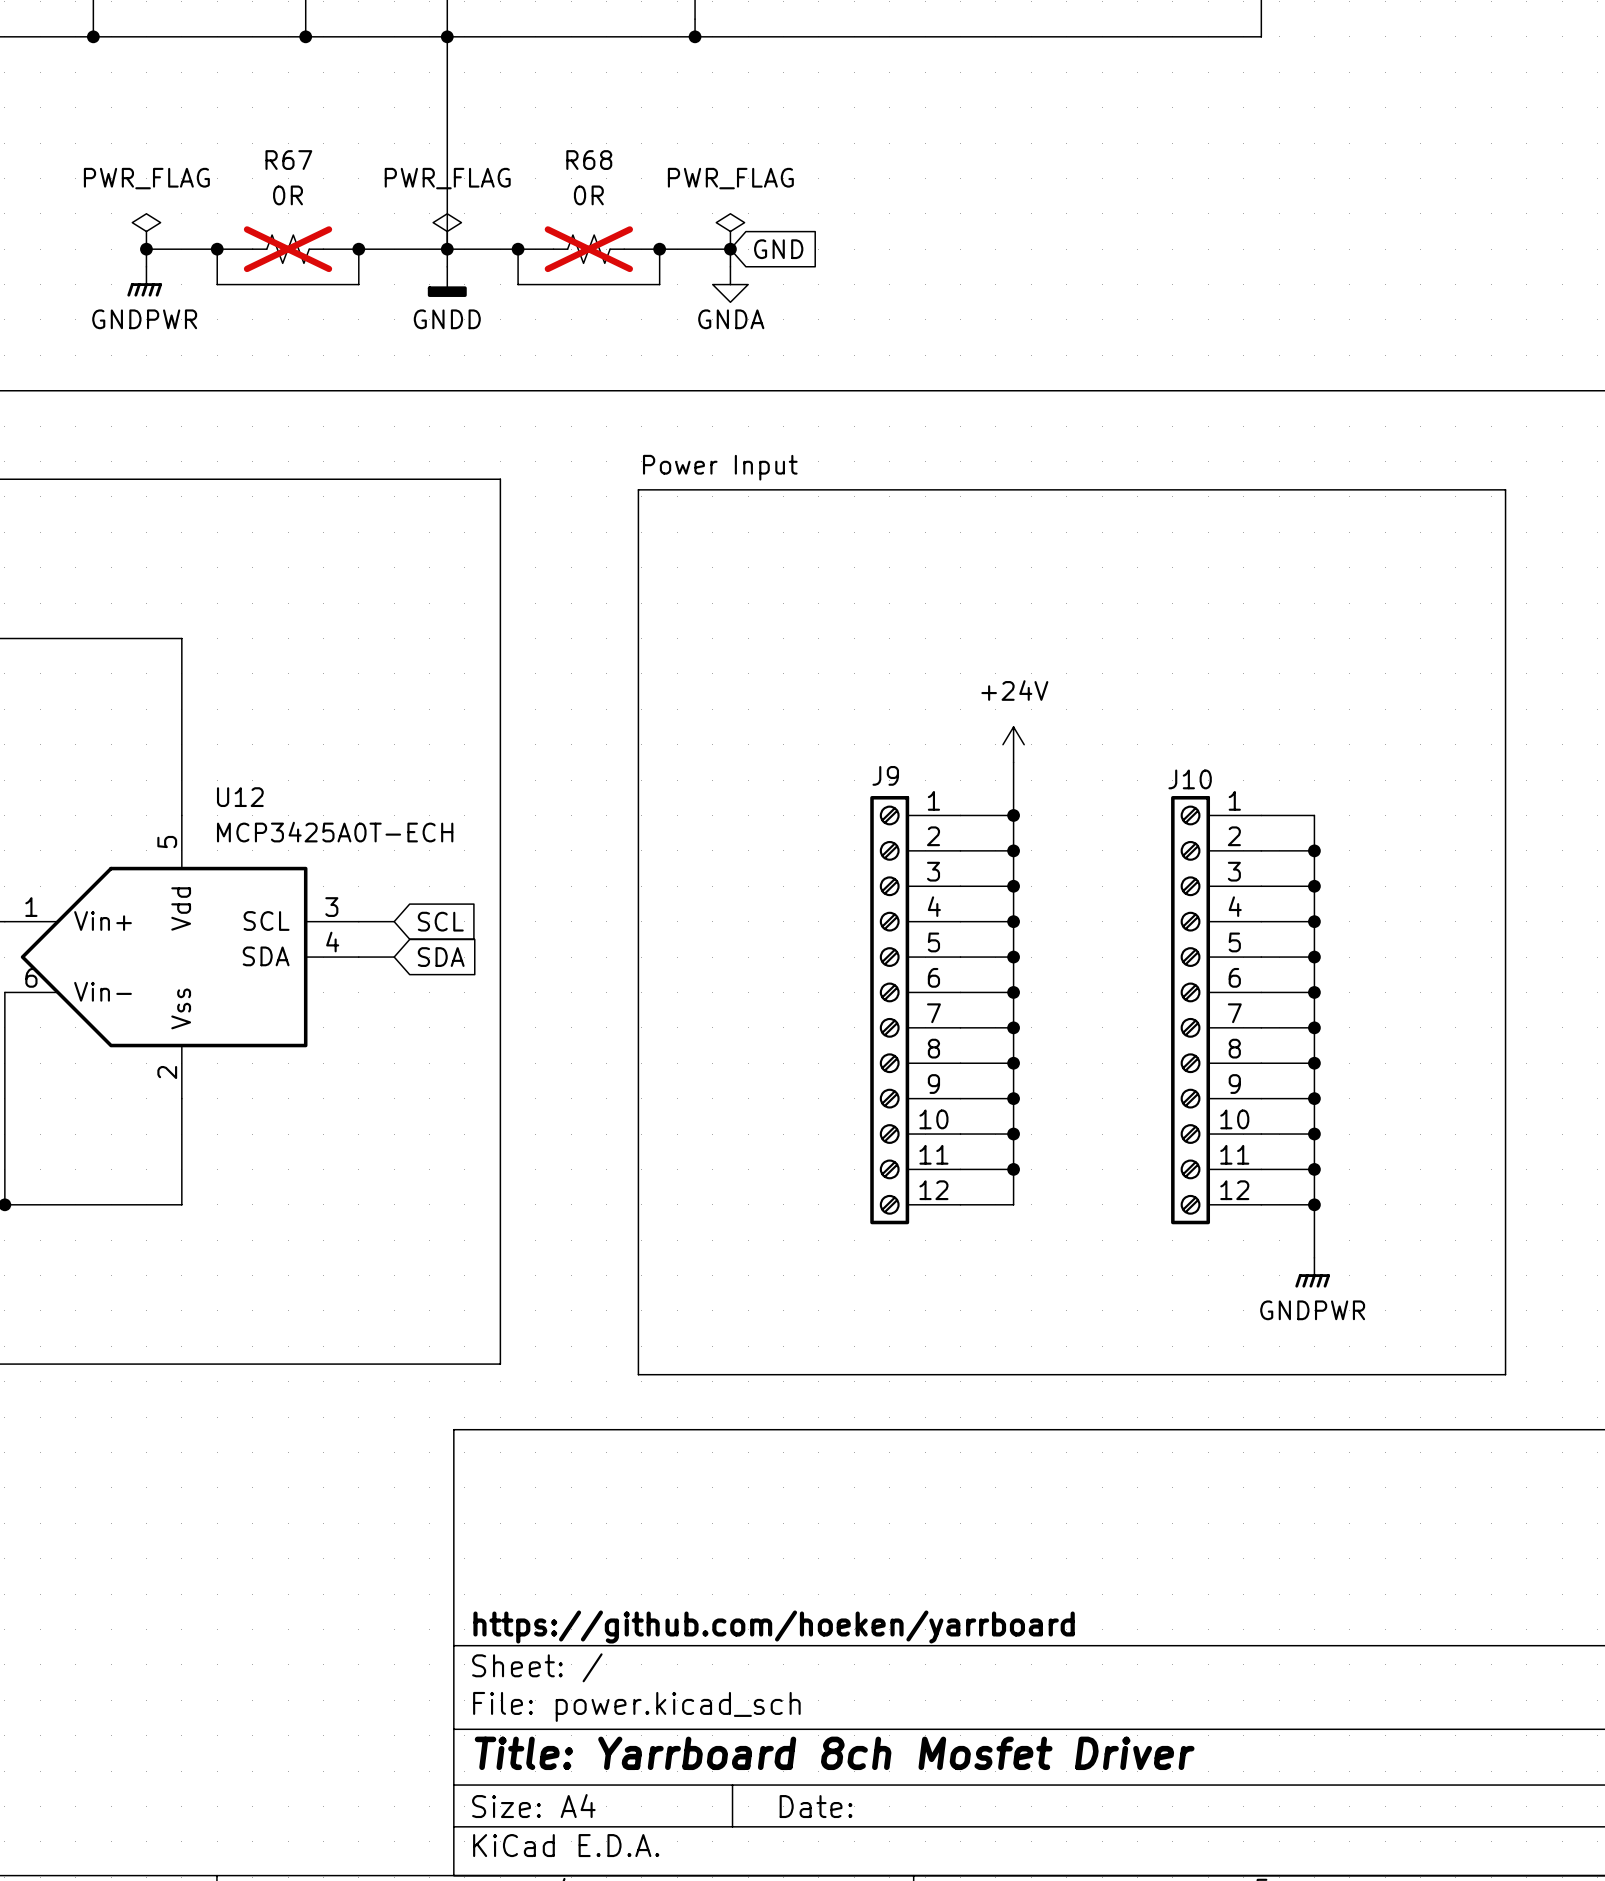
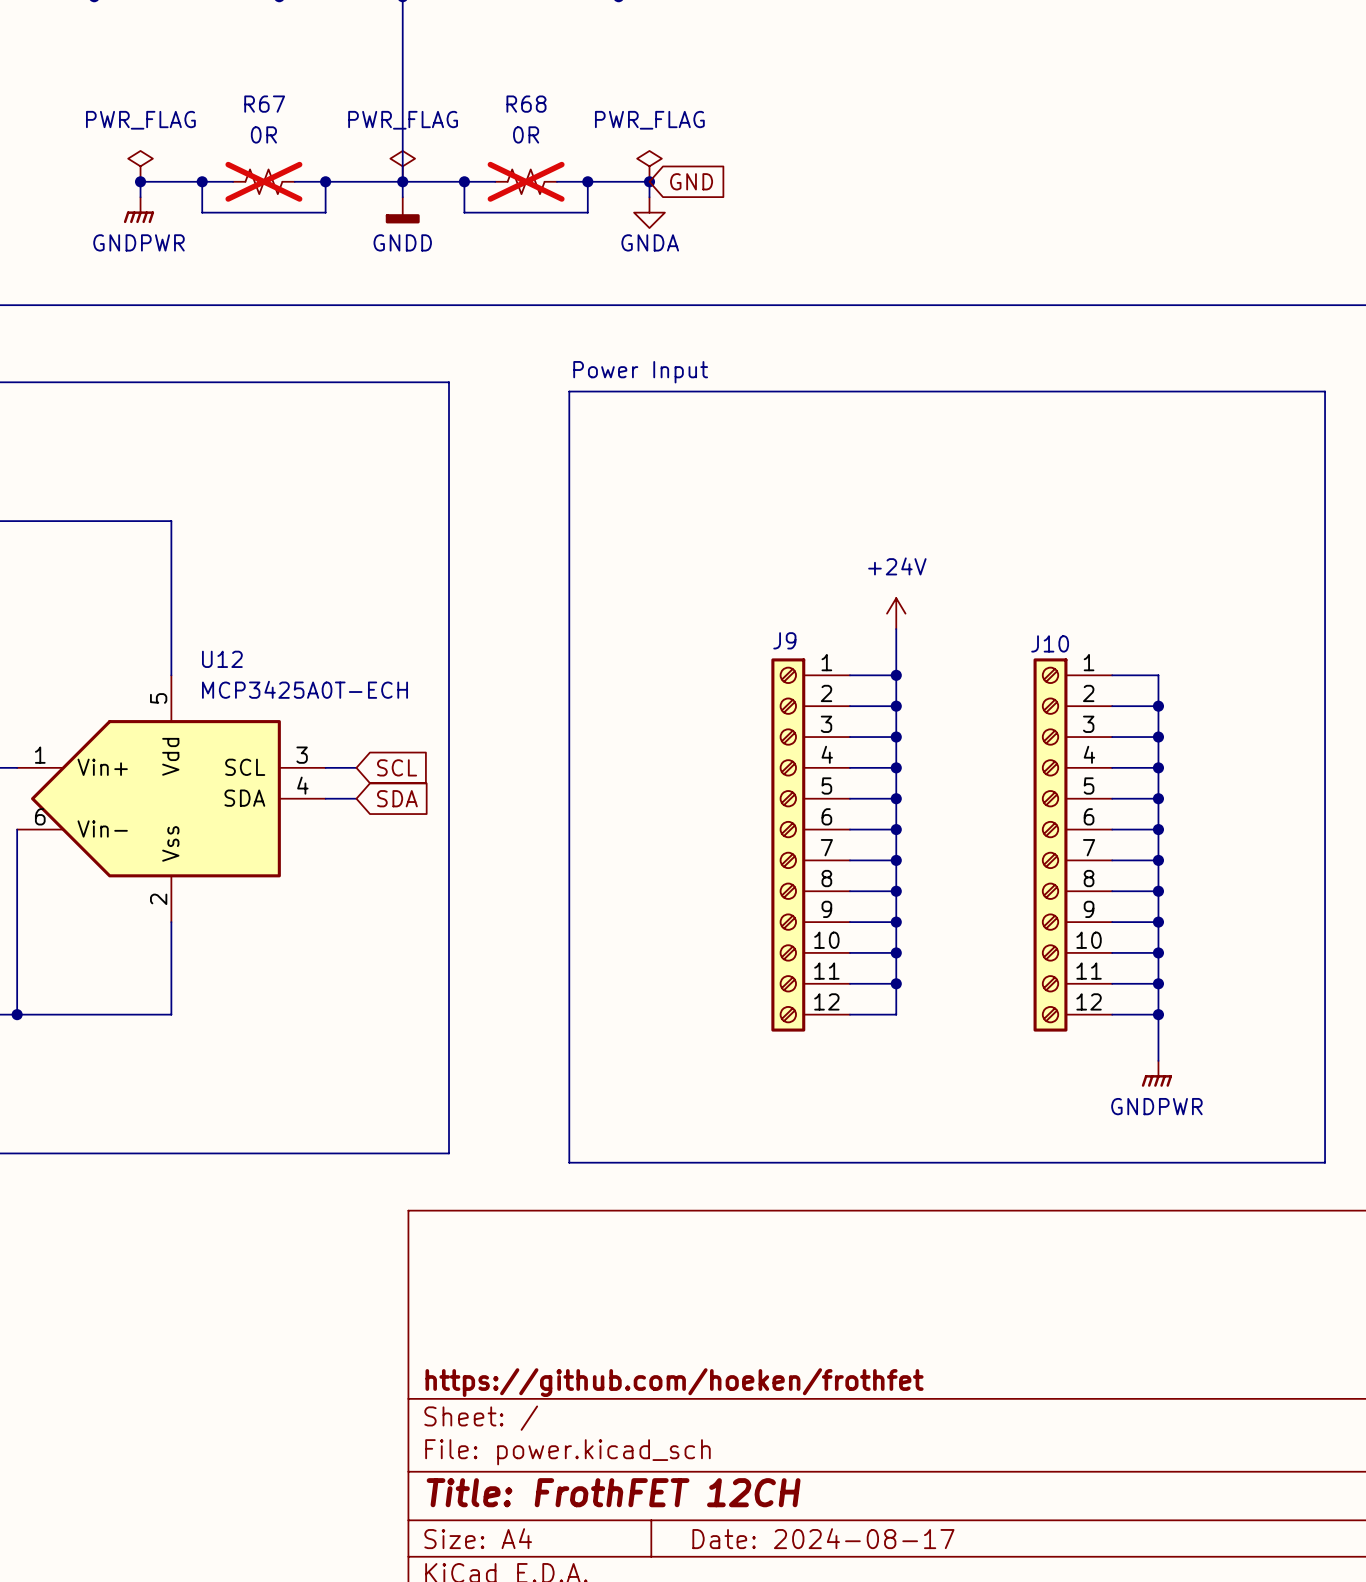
title block: https://github.com/hoeken/yarrboard (774, 1626) -> https://github.com/hoeken/frothfet (674, 1382)
title block: Title: Yarrboard 8ch Mosfet Driver (834, 1753) -> Title: FrothFET 12CH (613, 1492)
title block: Date: (816, 1806) -> Date: 2024-08-17 (823, 1538)

